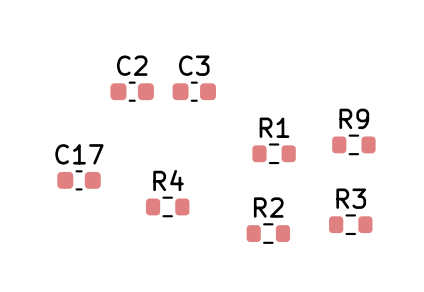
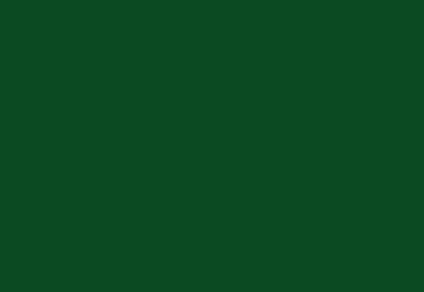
C2: (132, 91) -> none
C3: (194, 91) -> none
R9: (353, 144) -> none
R1: (274, 153) -> none
C17: (79, 180) -> none
R4: (167, 206) -> none
R3: (350, 224) -> none
R2: (268, 233) -> none

